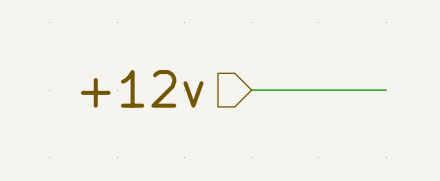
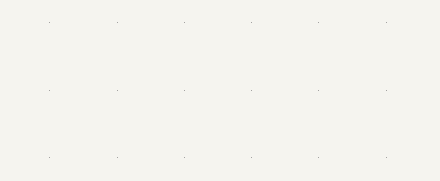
hierarchical label: +12v (142, 88) -> none
wire: (251, 90) (386, 90) -> none

